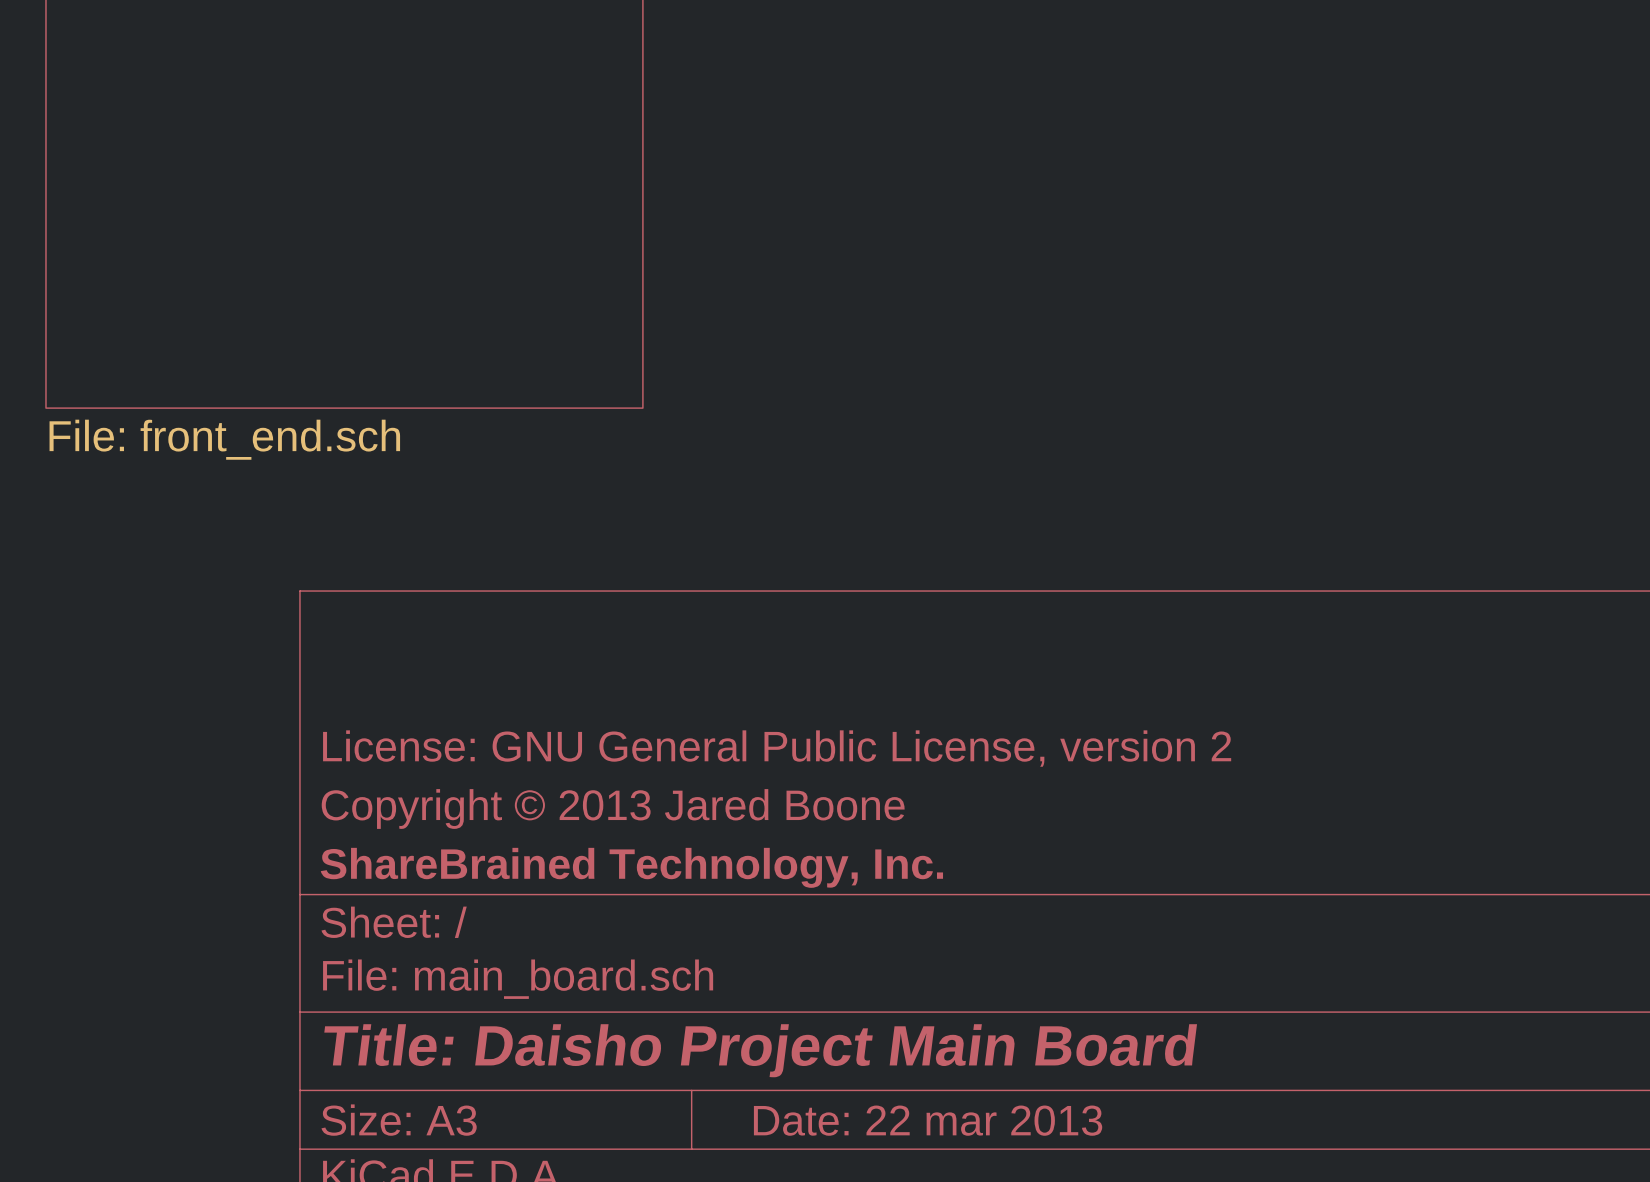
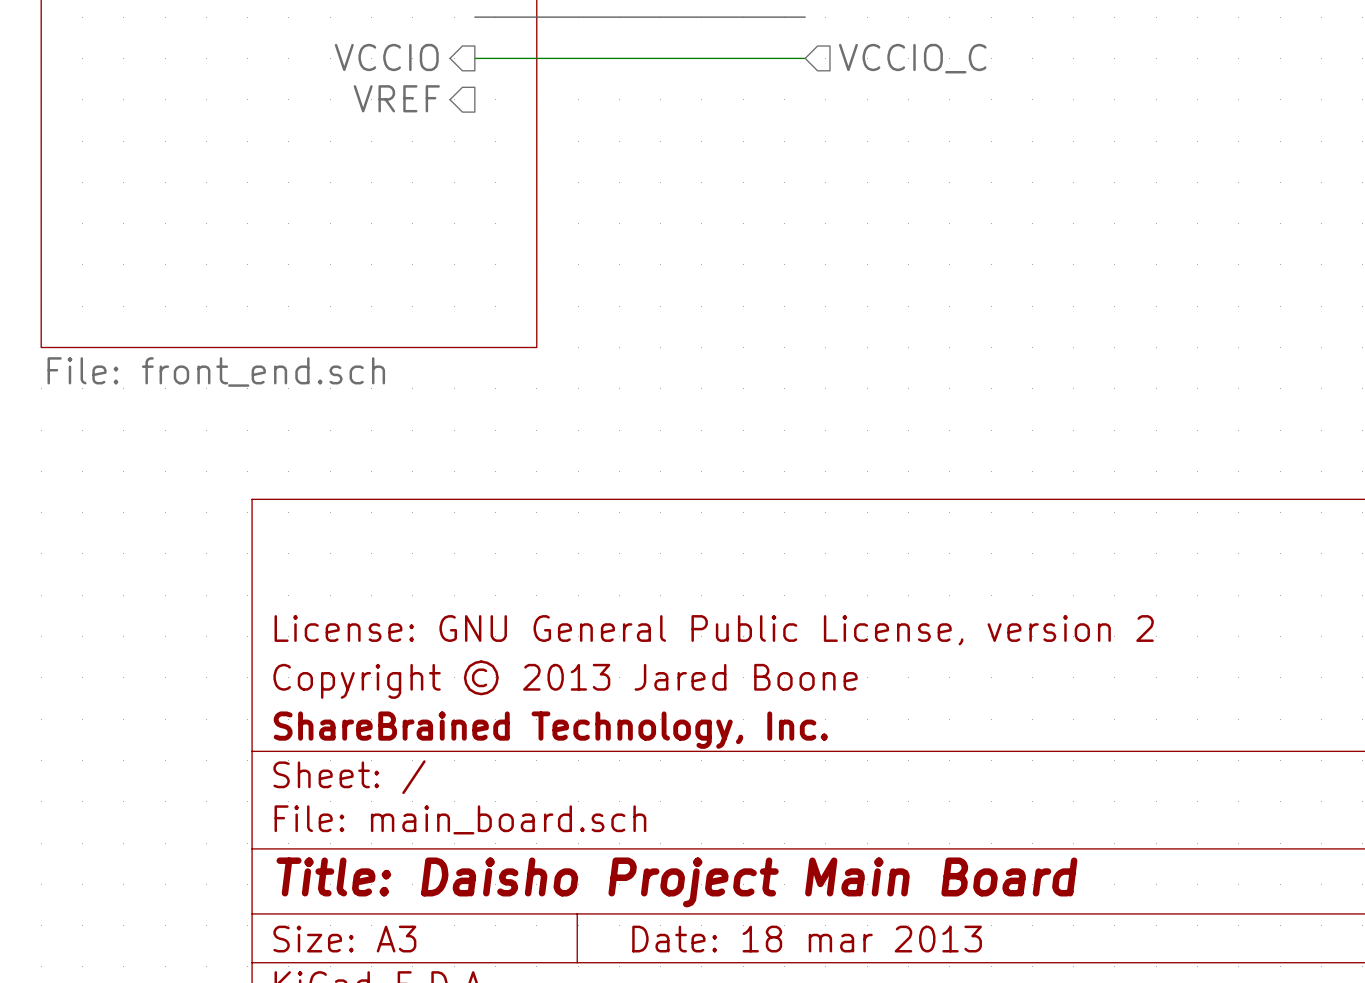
bus: none -> (474, 17) (805, 17)
sheet pin: none -> VCCIO (386, 57)
wire: none -> (474, 58) (805, 58)
sheet pin: none -> VCCIO_C (912, 58)
sheet pin: none -> VREF (396, 98)
title block: Date: 22 mar 2013 (928, 1120) -> Date: 18 mar 2013 (807, 939)

